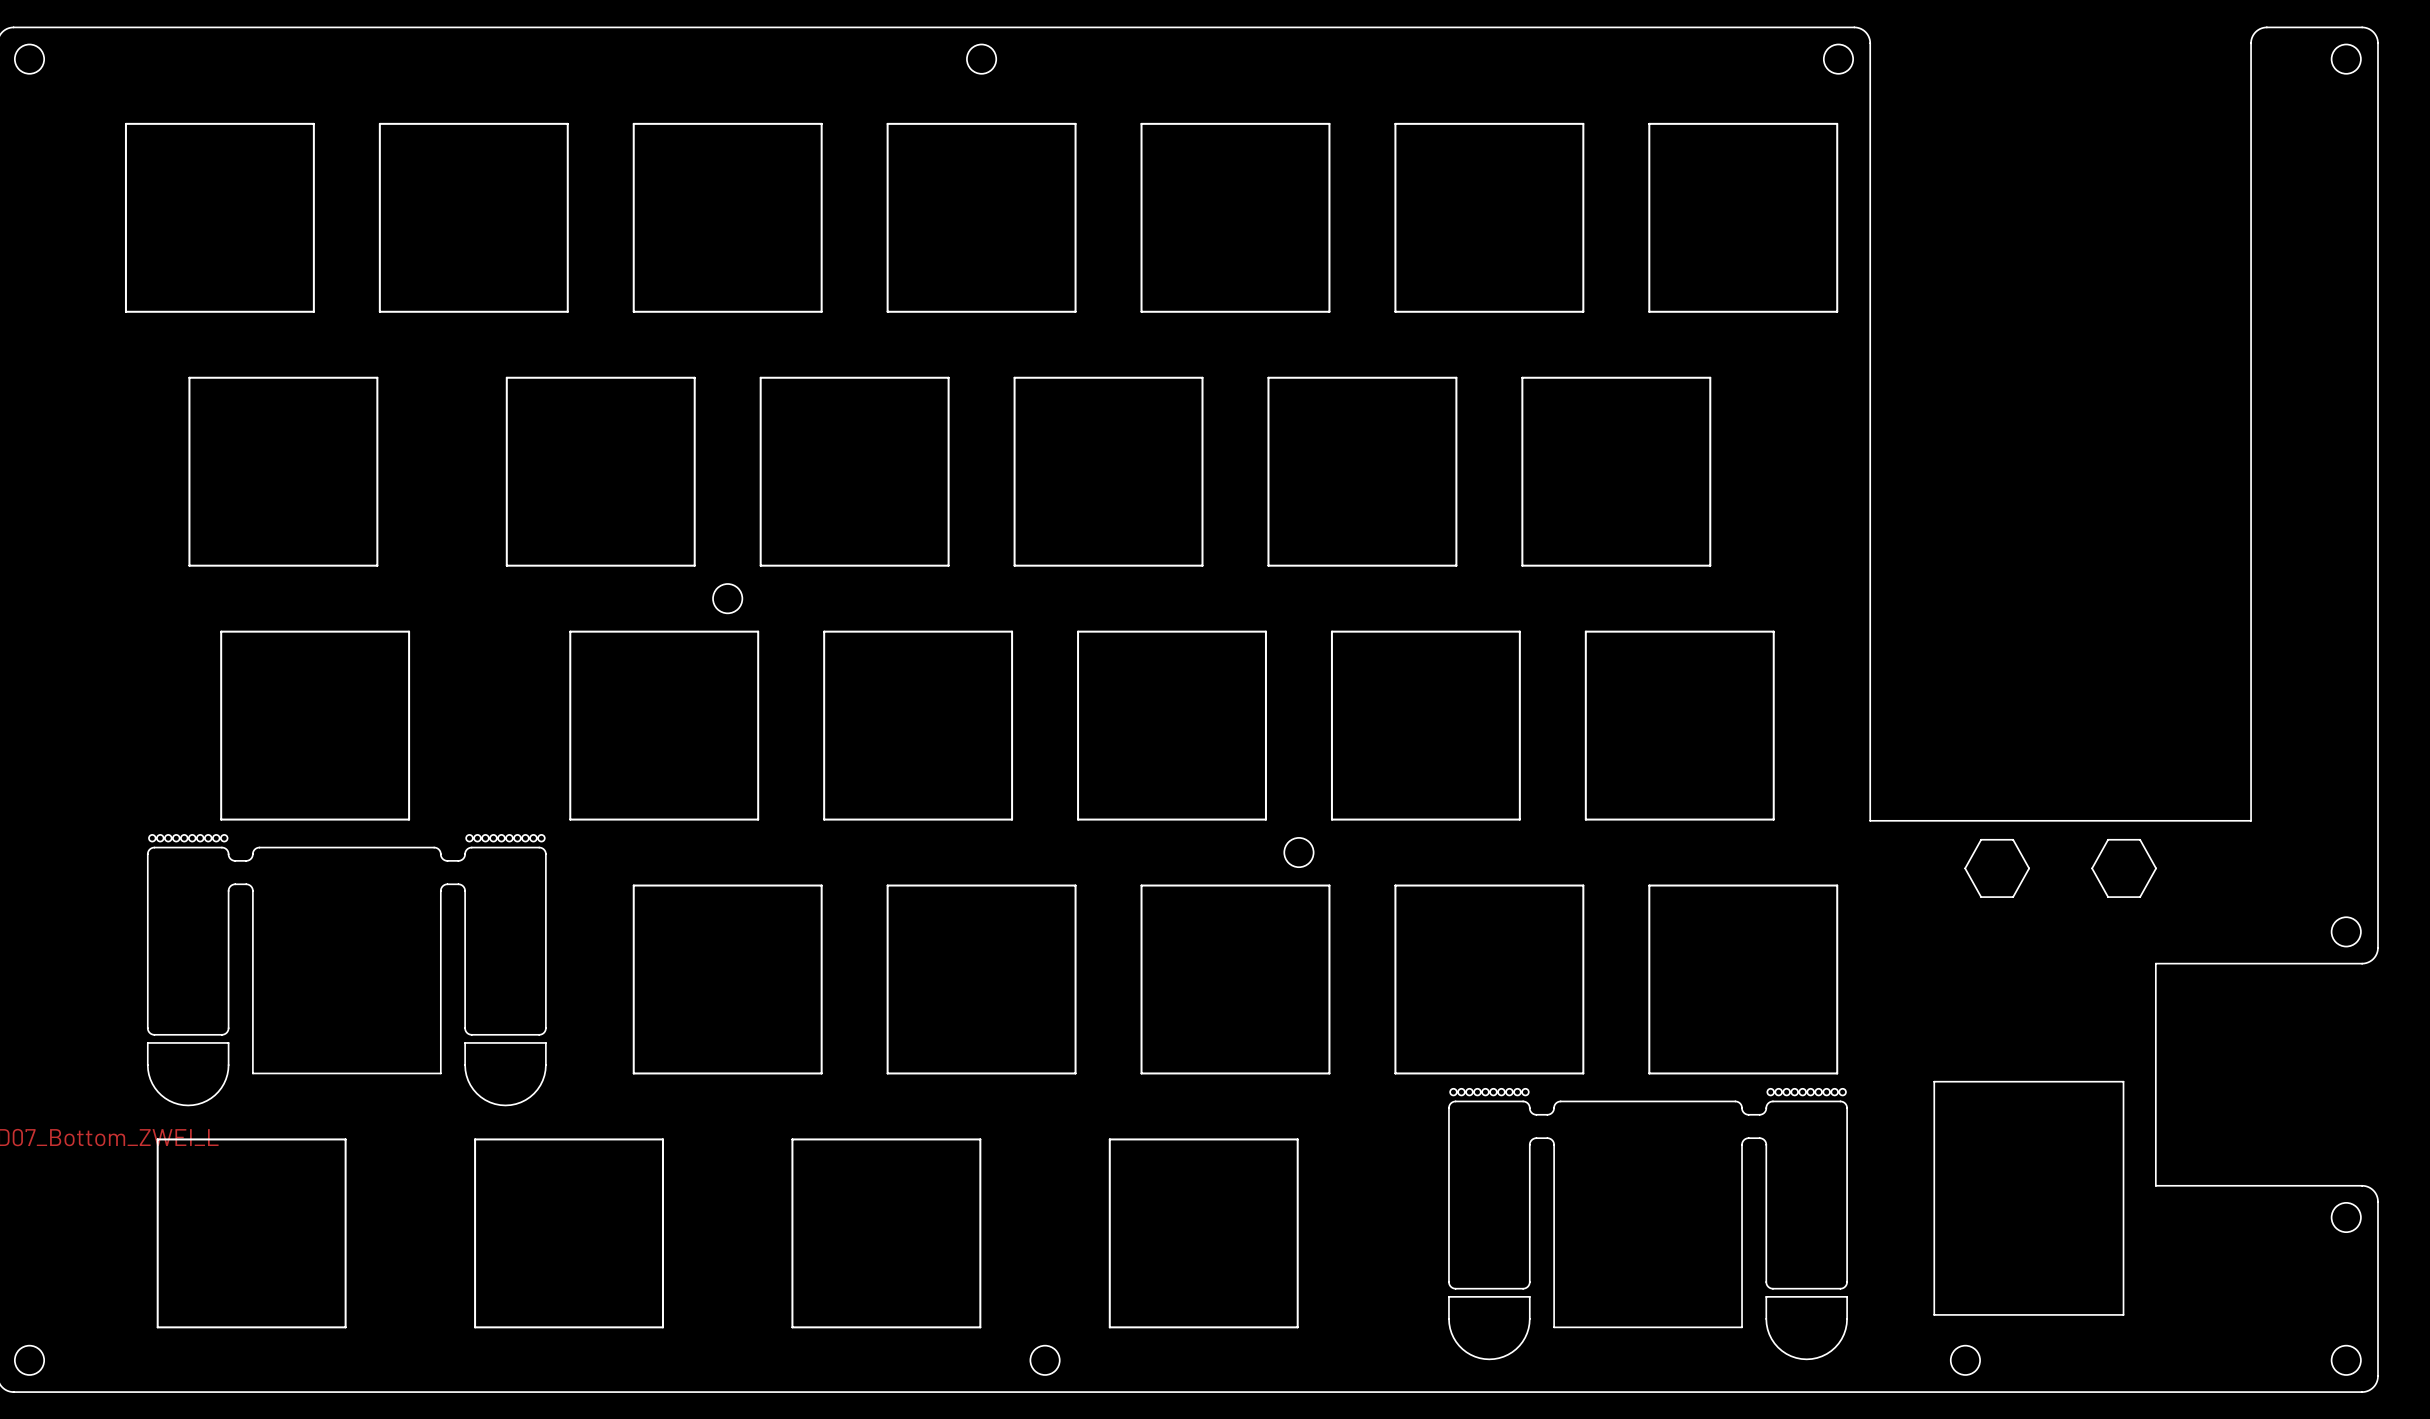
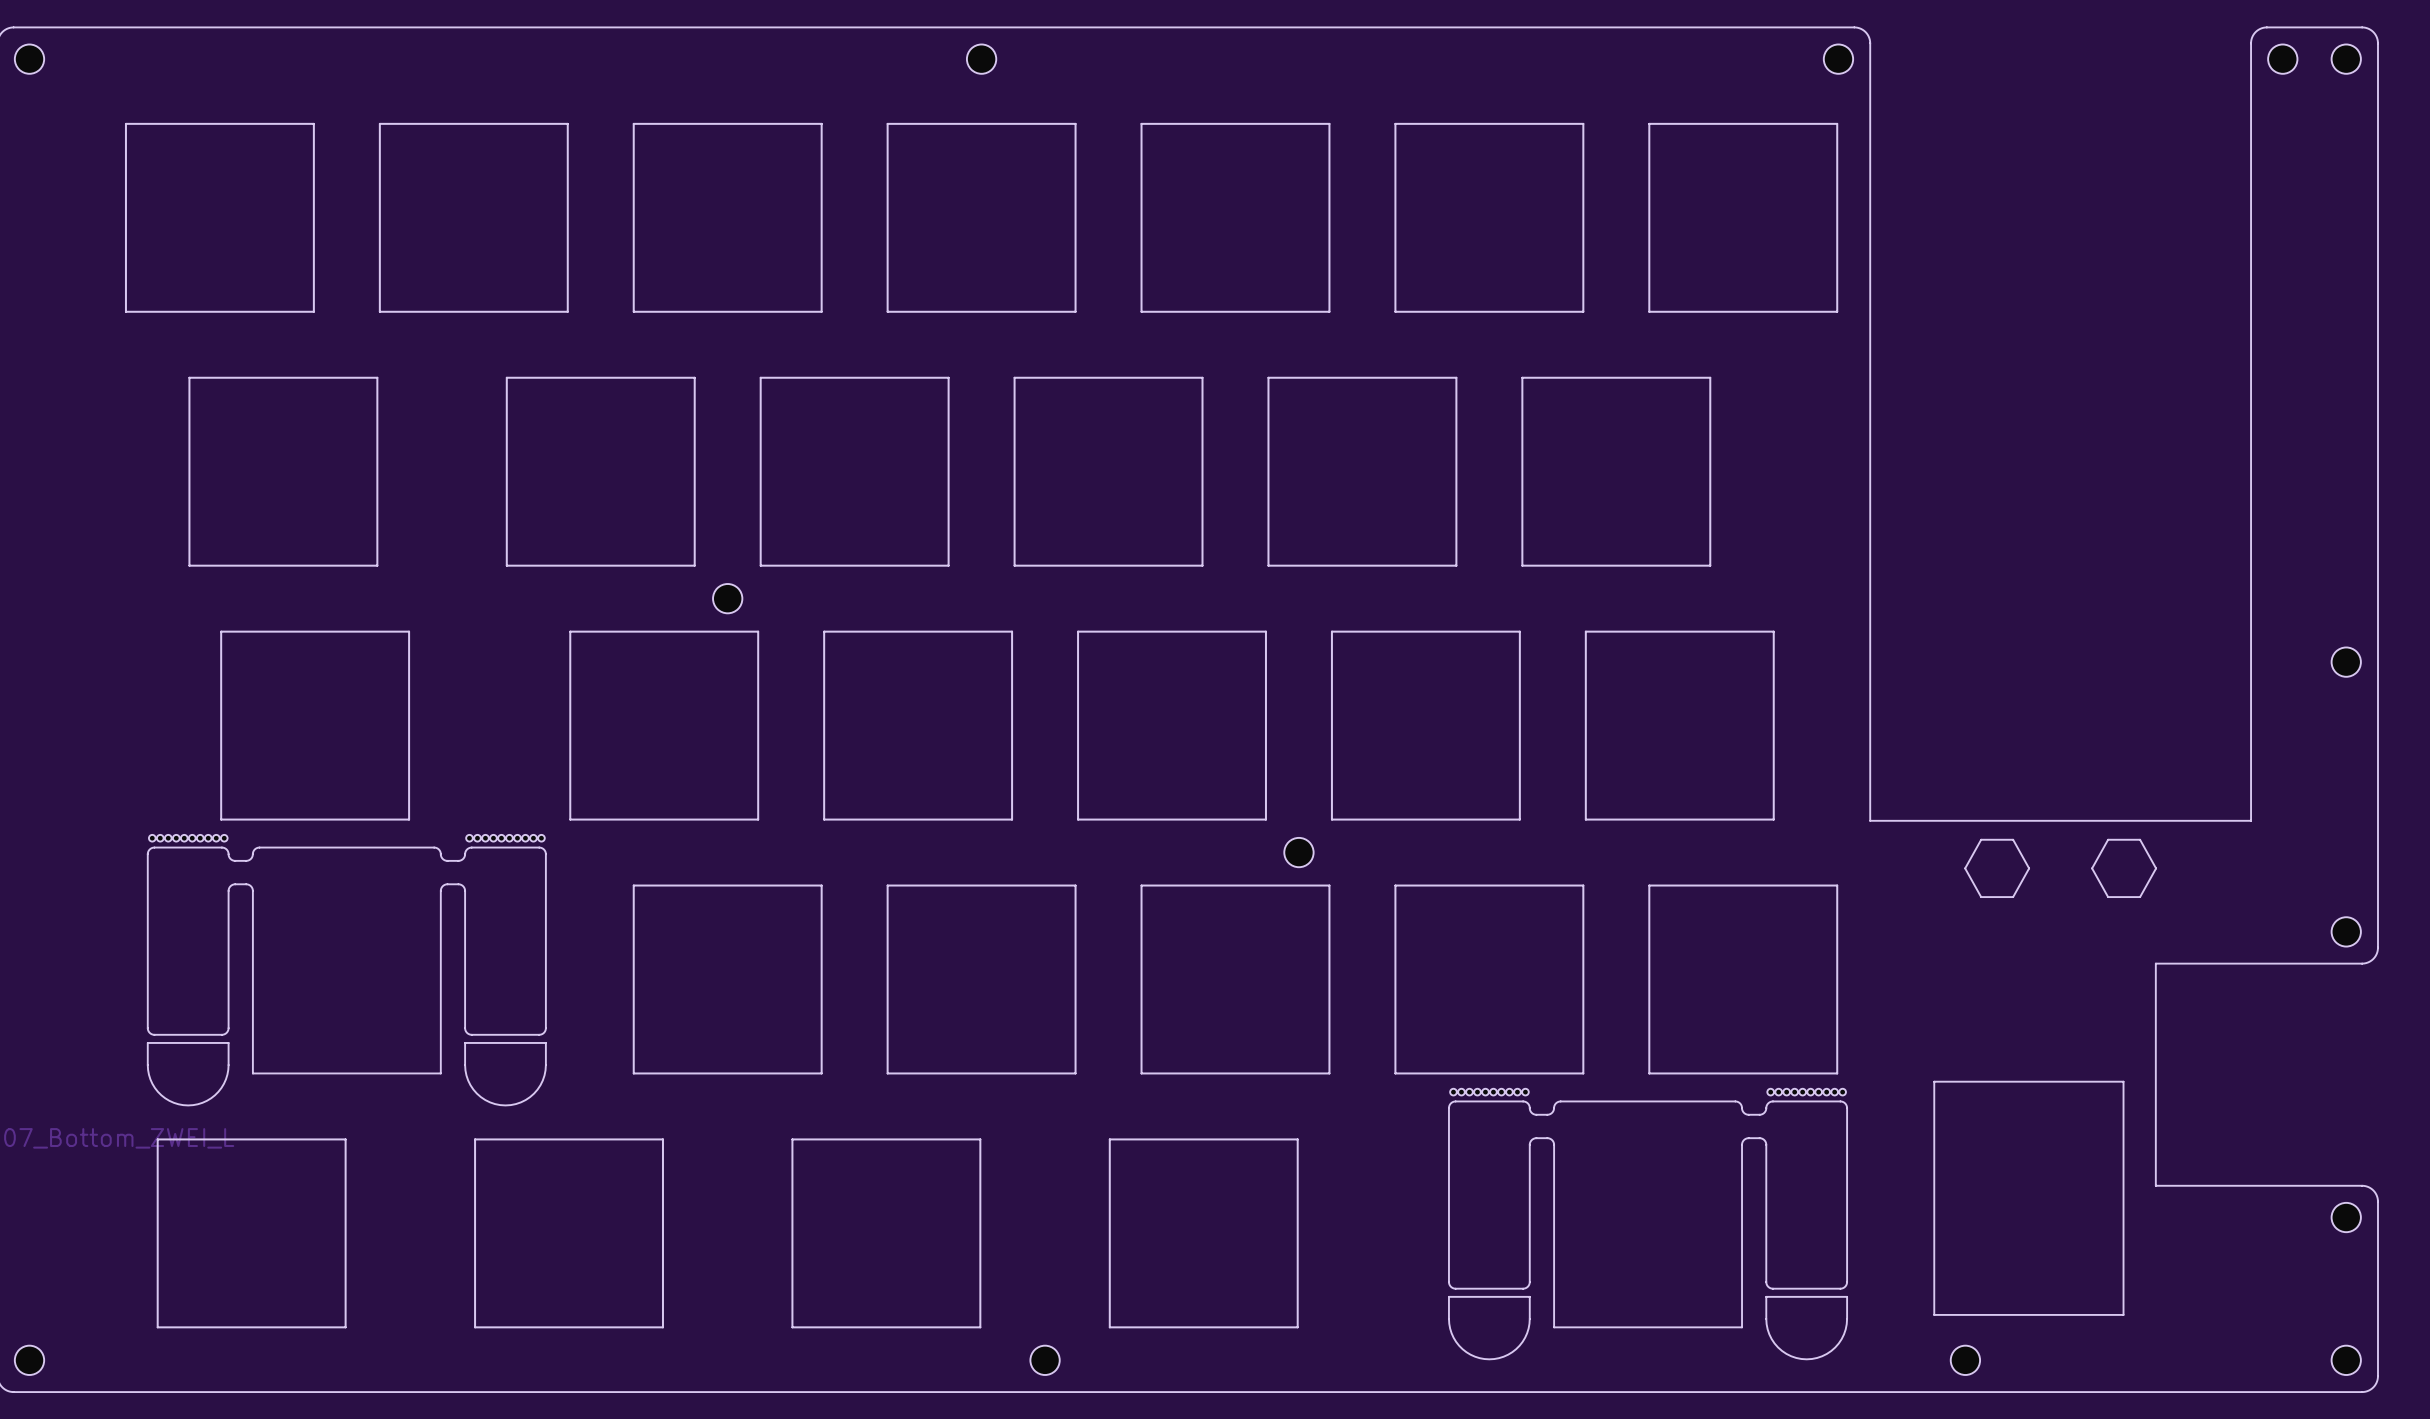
part: none -> (2282, 59)
part: none -> (2346, 662)

